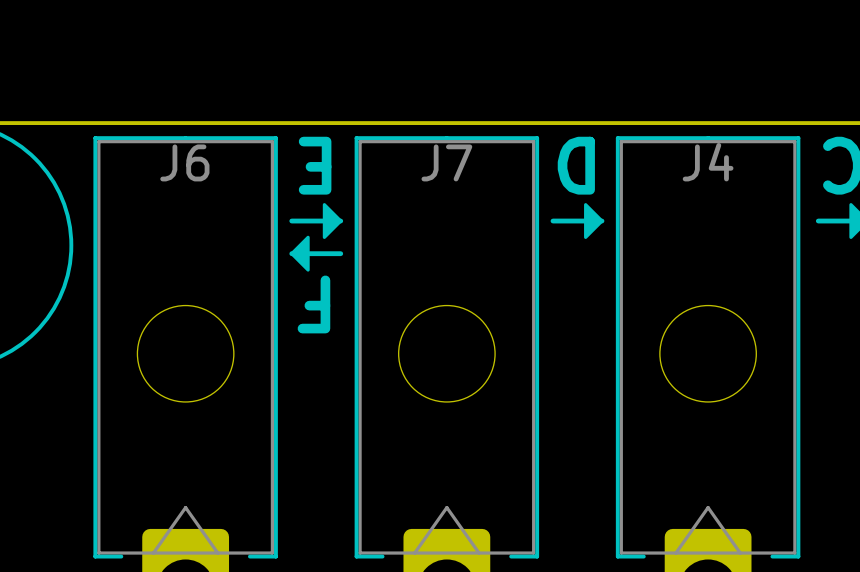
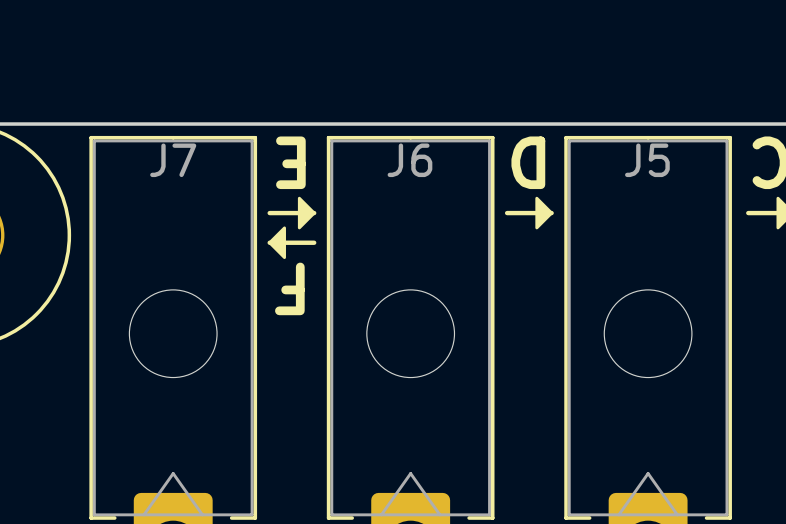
J6 name: J6 (184, 162) -> J7 (173, 160)
J7 name: J7 (446, 162) -> J6 (409, 160)
J4 name: J4 (708, 162) -> J5 (647, 160)

